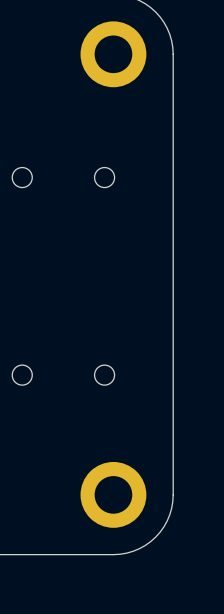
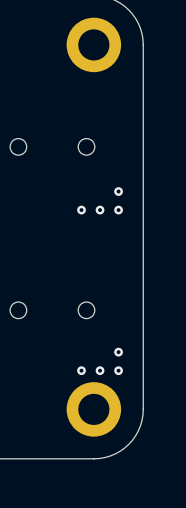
via: none -> (118, 191)
via: none -> (81, 210)
via: none -> (100, 210)
via: none -> (118, 210)
via: none -> (118, 352)
via: none -> (81, 370)
via: none -> (100, 370)
via: none -> (118, 370)

